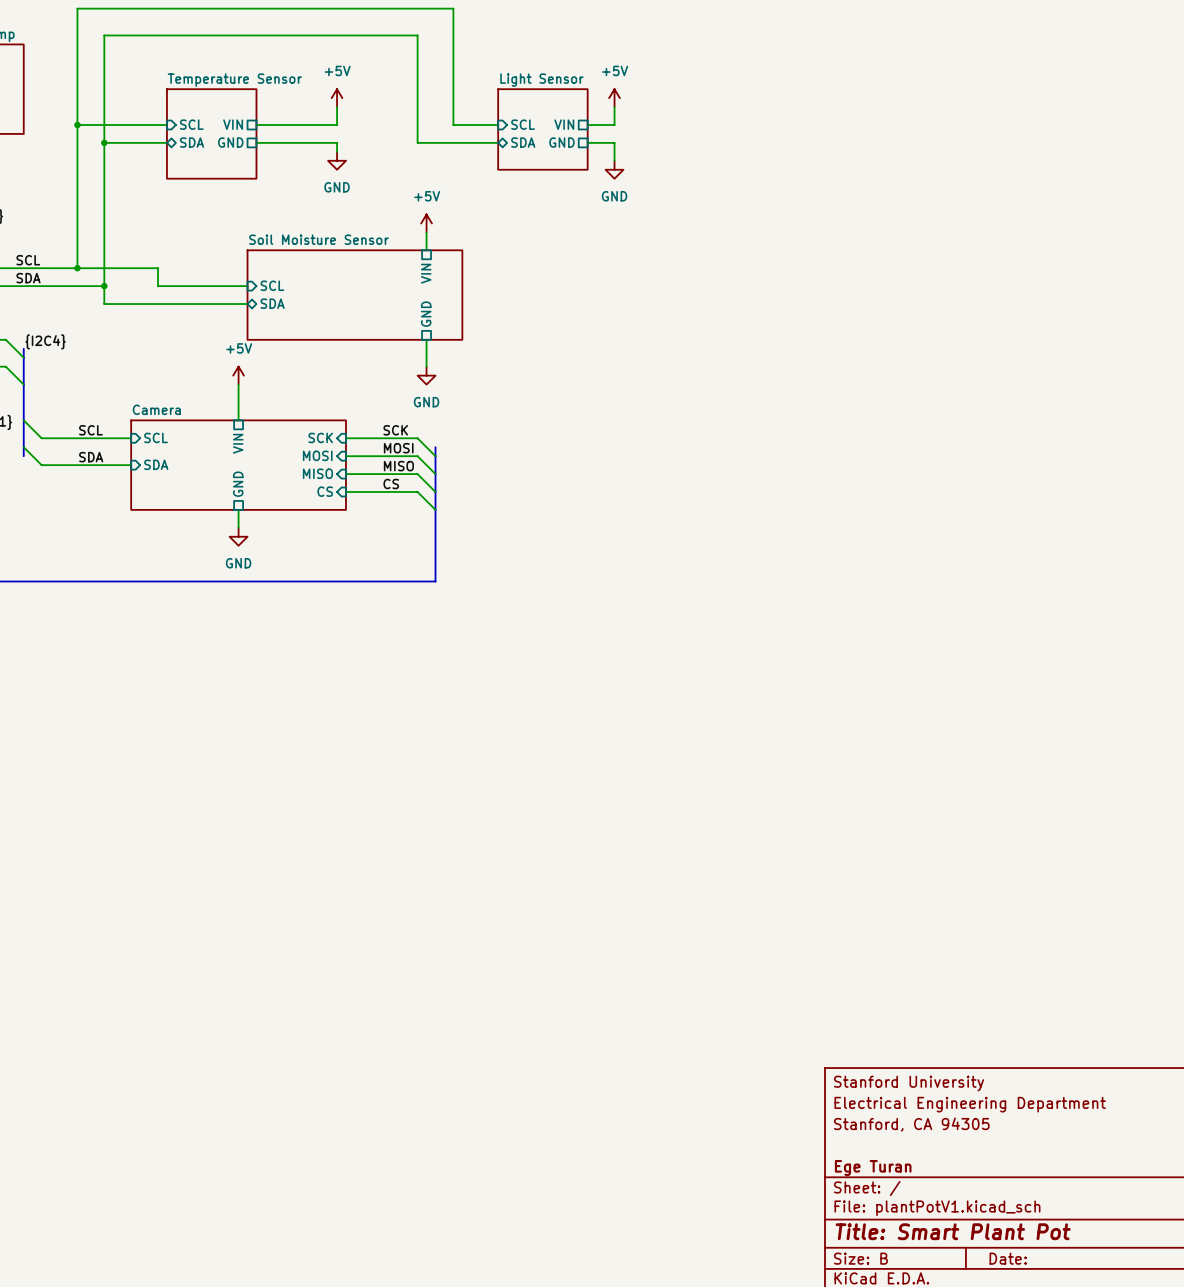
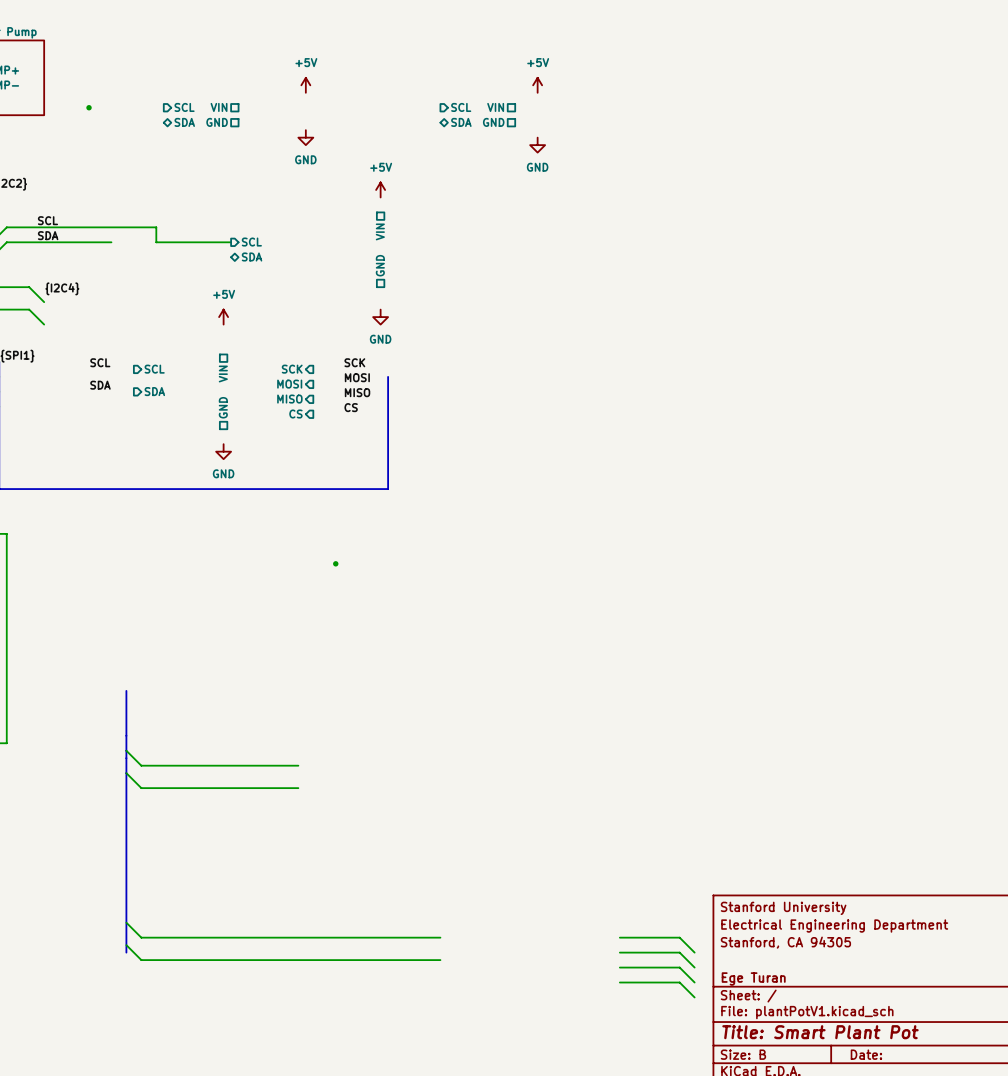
wire: (337, 107) (337, 124) (256, 124) -> none
wire: (614, 107) (614, 124) (587, 124) -> none
wire: (77, 124) (166, 124) -> none
wire: (498, 124) (453, 124) (453, 8) (77, 8) (77, 268) -> none
sheet Light Sensor: (542, 129) -> none
sheet Temperature Sensor: (211, 133) -> none
wire: (104, 142) (166, 142) -> none
junction: (104, 142) -> none
wire: (256, 142) (337, 142) (337, 151) -> none
wire: (498, 142) (417, 142) (417, 35) (104, 35) (104, 304) (247, 304) -> none
wire: (587, 142) (614, 142) (614, 160) -> none
wire: (426, 232) (426, 250) -> none
junction: (77, 268) -> none
junction: (104, 286) -> none
sheet Soil Moisture Sensor: (354, 295) -> none
wire: (426, 339) (426, 366) -> none
bus: (23, 348) (23, 456) -> none
wire: (238, 384) (238, 420) -> none
wire: (23, 420) (41, 438) (131, 438) -> none
wire: (345, 438) (417, 438) (435, 456) -> none
wire: (23, 447) (41, 465) (131, 465) -> none
wire: (345, 456) (417, 456) (435, 474) -> none
sheet Camera: (238, 465) -> none
wire: (345, 474) (417, 474) (435, 491) -> none
wire: (345, 491) (417, 491) (435, 509) -> none
wire: (238, 509) (238, 527) -> none
junction: none -> (335, 563)
bus: none -> (126, 690) (126, 952)
wire: none -> (126, 750) (141, 765) (298, 765)
wire: none -> (126, 773) (141, 788) (298, 788)
wire: none -> (126, 922) (141, 937) (440, 937)
wire: none -> (619, 937) (679, 937) (694, 952)
wire: none -> (126, 945) (141, 960) (440, 960)
wire: none -> (619, 952) (679, 952) (694, 967)
wire: none -> (619, 967) (679, 967) (694, 982)
wire: none -> (619, 982) (679, 982) (694, 997)

